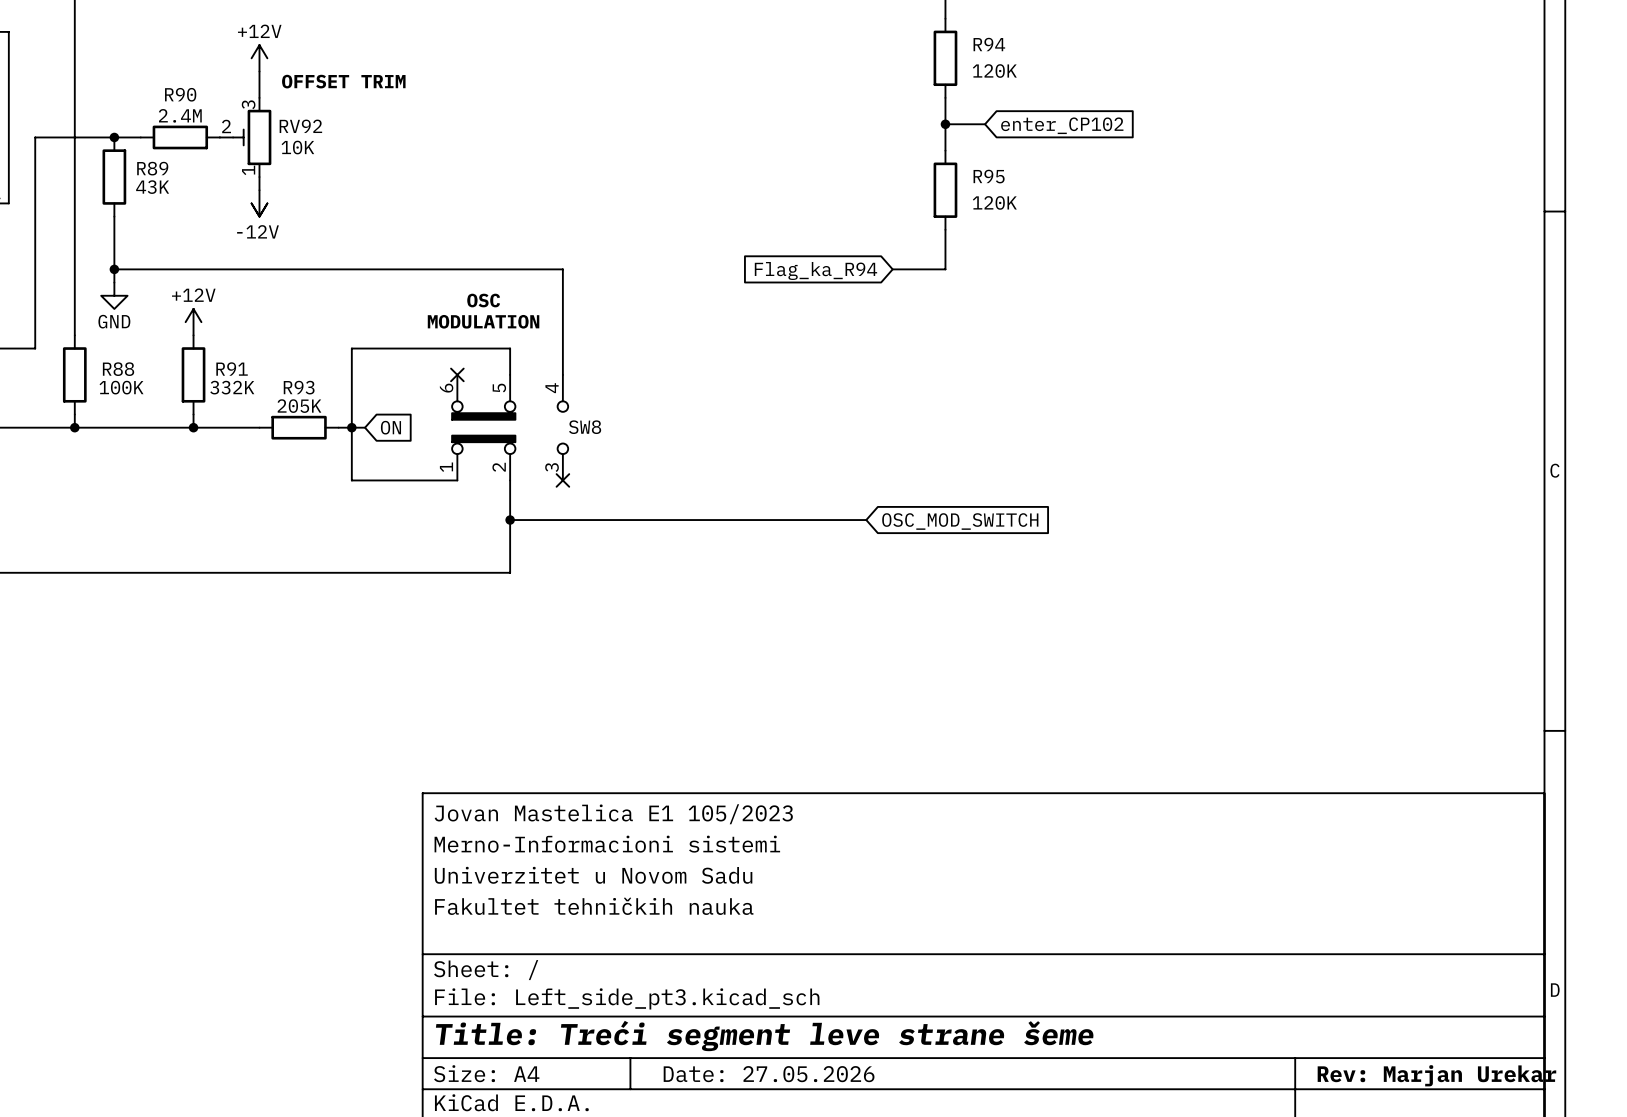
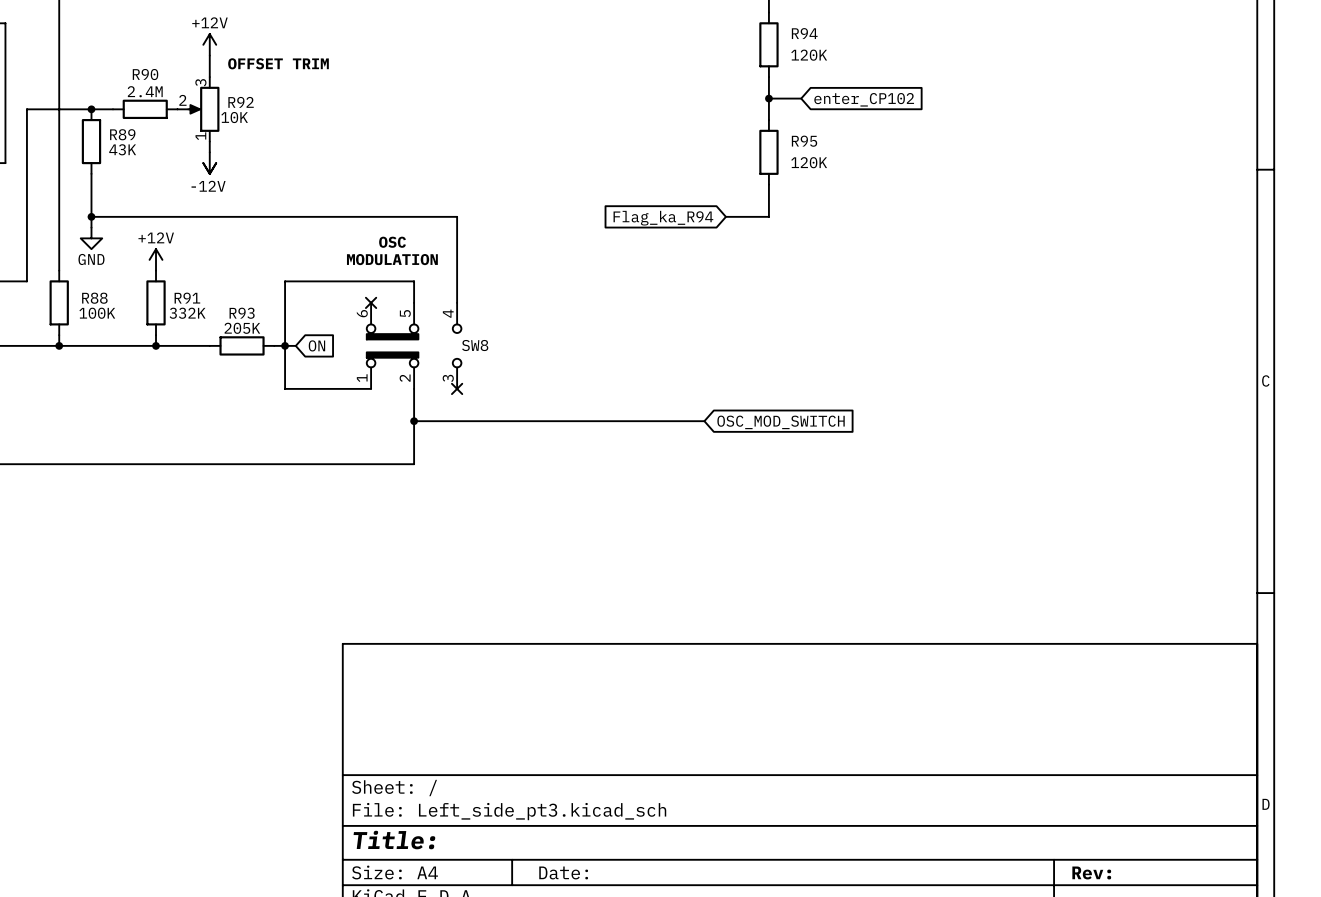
RV92: 10K (245, 137) -> none
R92: none -> 10K (198, 109)
title block: Jovan Mastelica E1 105/2023 (613, 814) -> none
title block: Merno-Informacioni sistemi (607, 844) -> none
title block: Univerzitet u Novom Sadu (593, 875) -> none
title block: Fakultet tehničkih nauka (594, 906) -> none
title block: Title: Treći segment leve strane šeme (764, 1035) -> Title: (394, 840)
title block: Date: 27.05.2026 (769, 1074) -> Date: (563, 872)
title block: Rev: Marjan Urekar (1436, 1075) -> Rev: (1091, 872)

